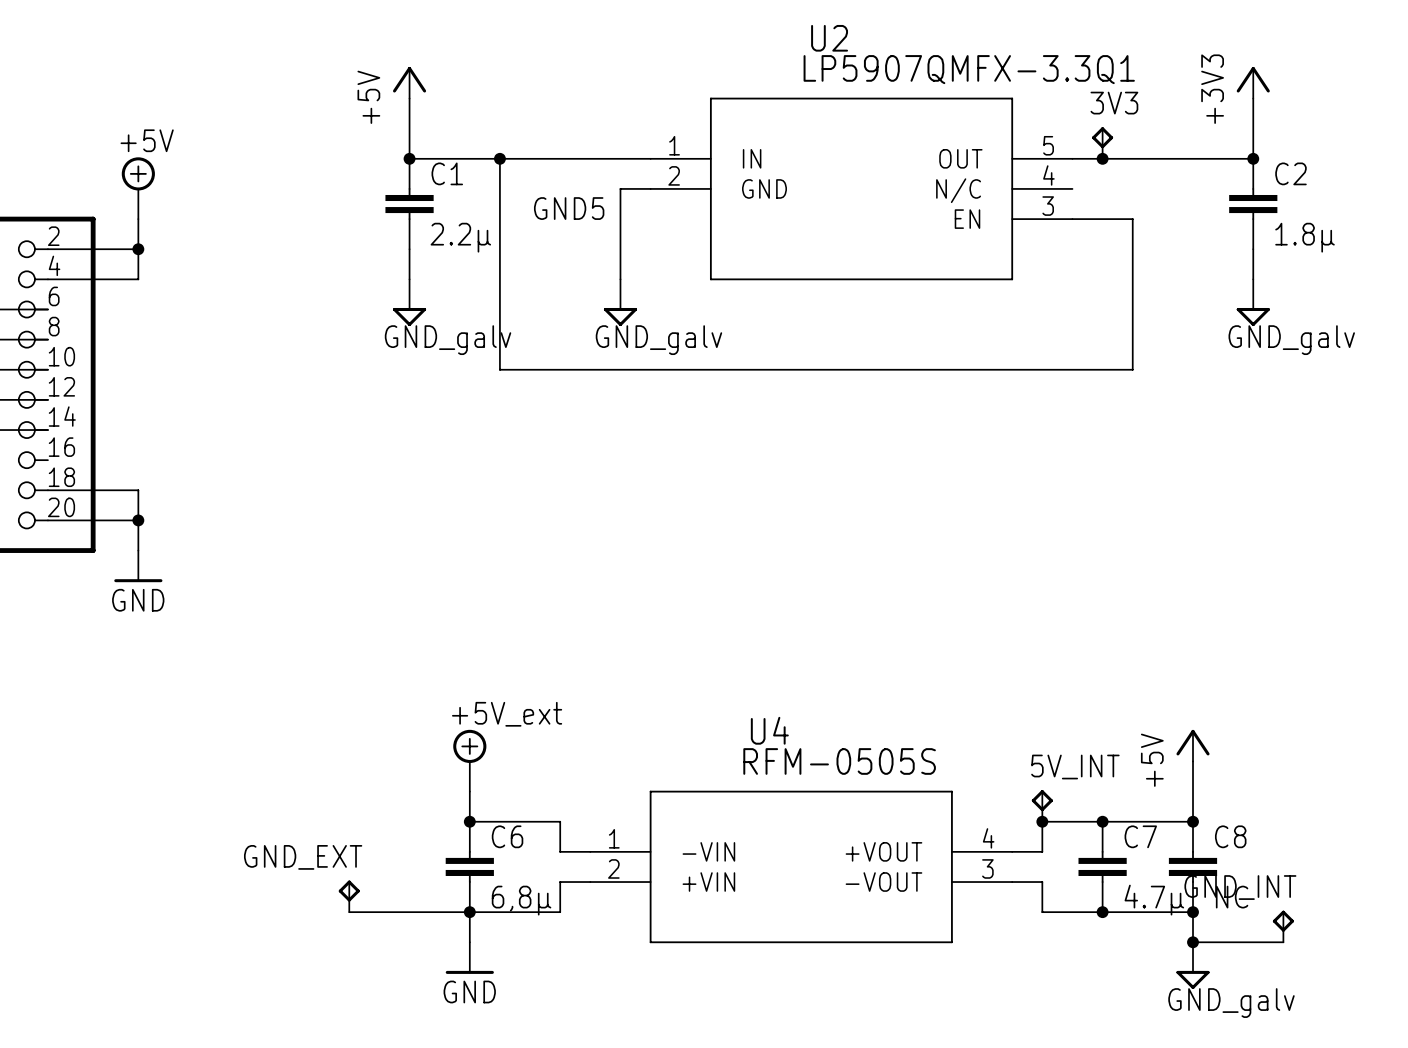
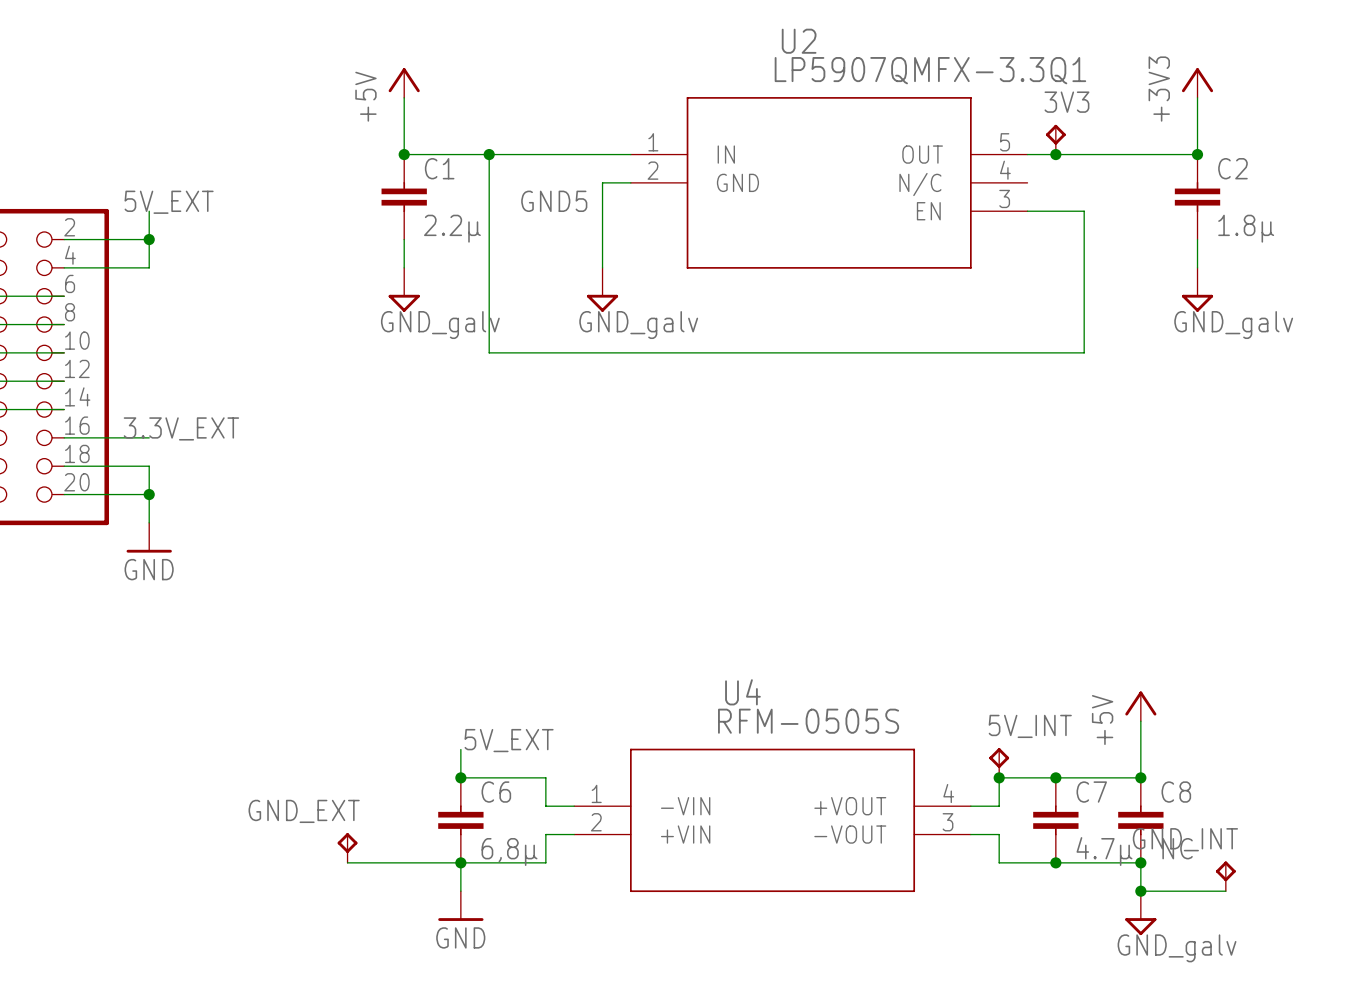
power symbol: +5V (138, 188) -> none
label: none -> 5V_EXT (169, 202)
label: none -> 3.3V_EXT (181, 428)
wire: none -> (64, 437) (149, 437)
power symbol: +5V_ext (469, 760) -> none
label: none -> 5V_EXT (509, 740)

